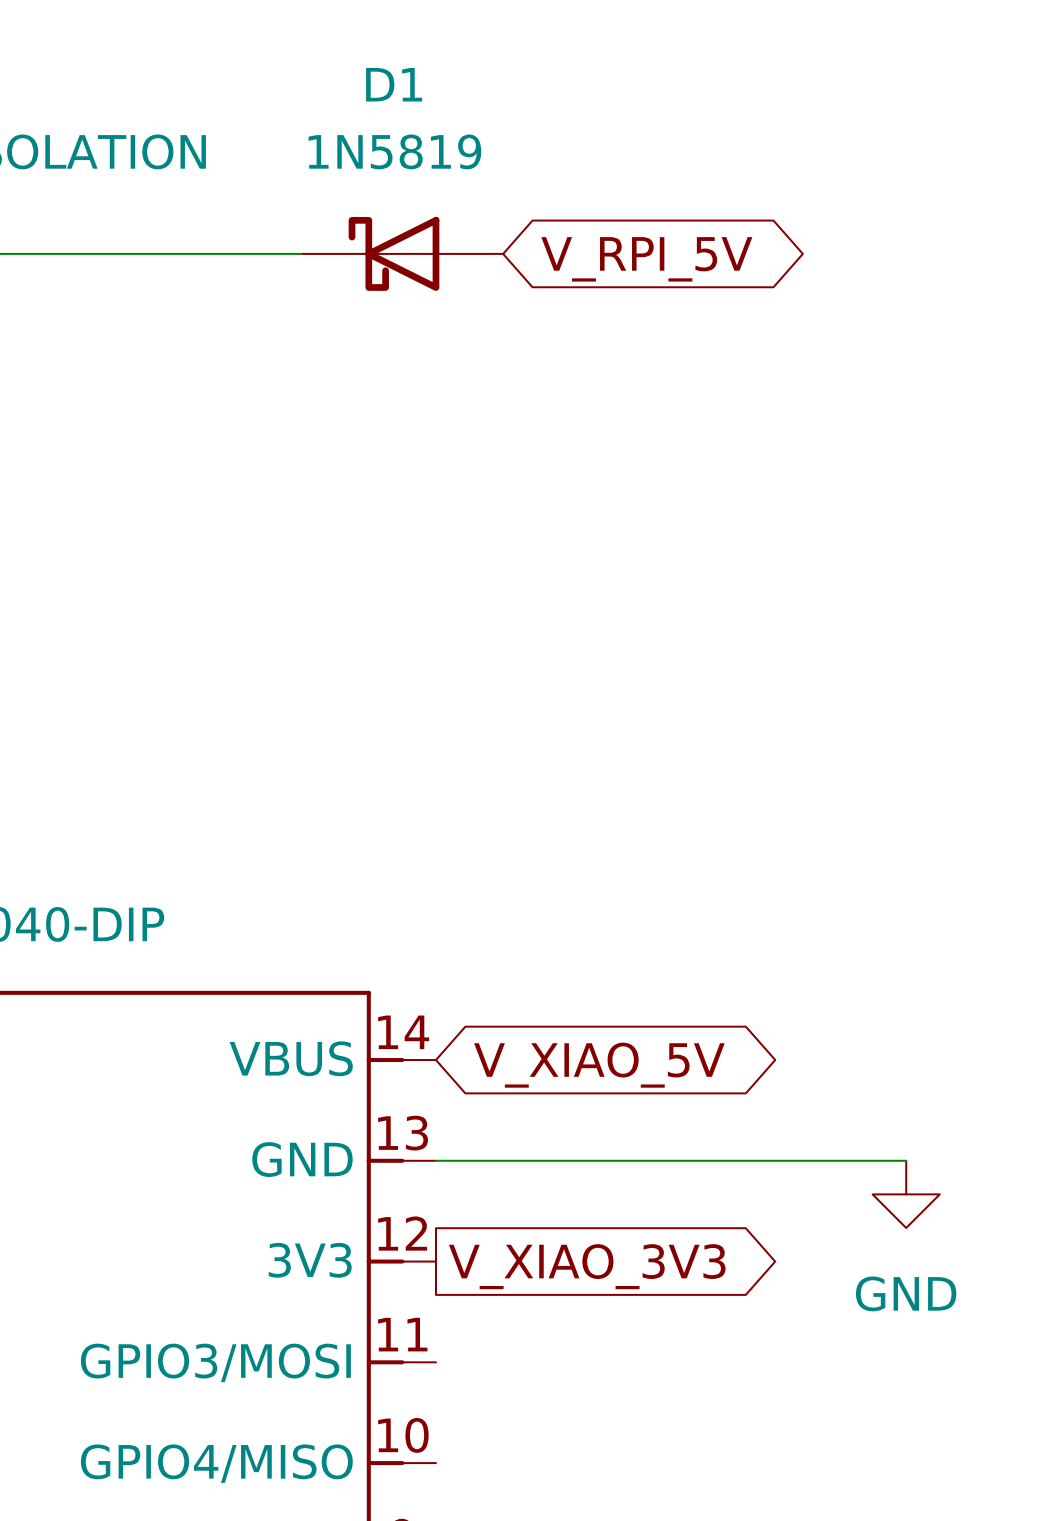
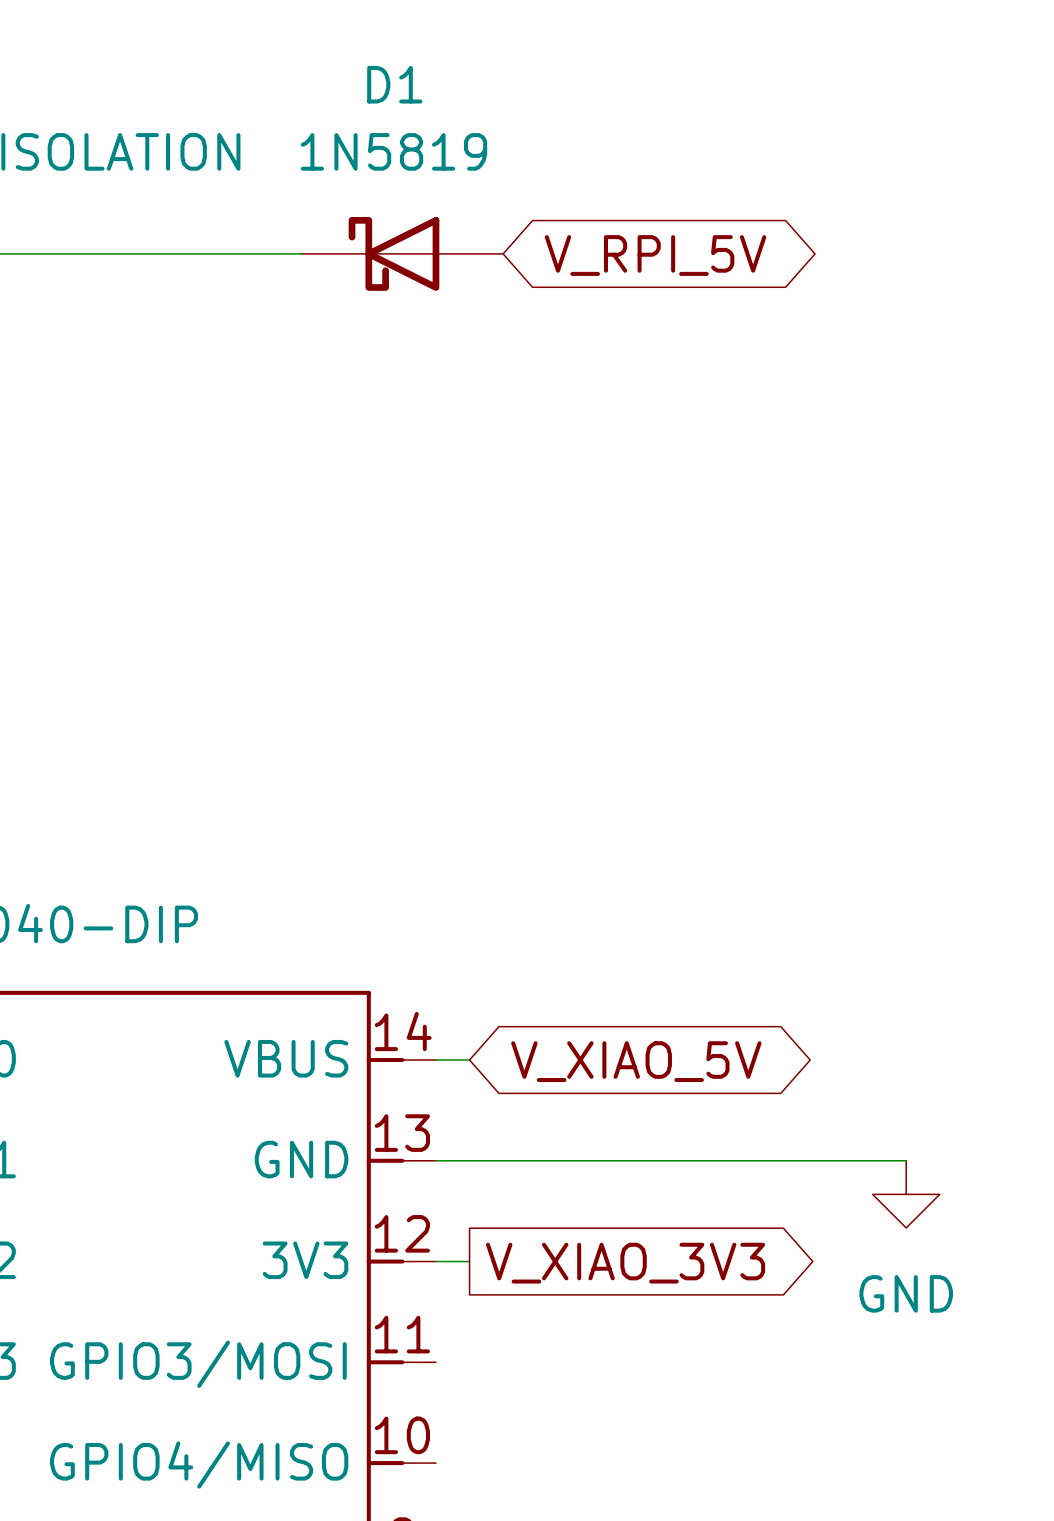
wire: none -> (435, 1060) (469, 1060)
global label position: V_XIAO_5V (599, 1065) -> V_XIAO_5V (636, 1061)
wire: none -> (435, 1261) (469, 1261)
global label position: V_XIAO_3V3 (587, 1266) -> V_XIAO_3V3 (625, 1263)

